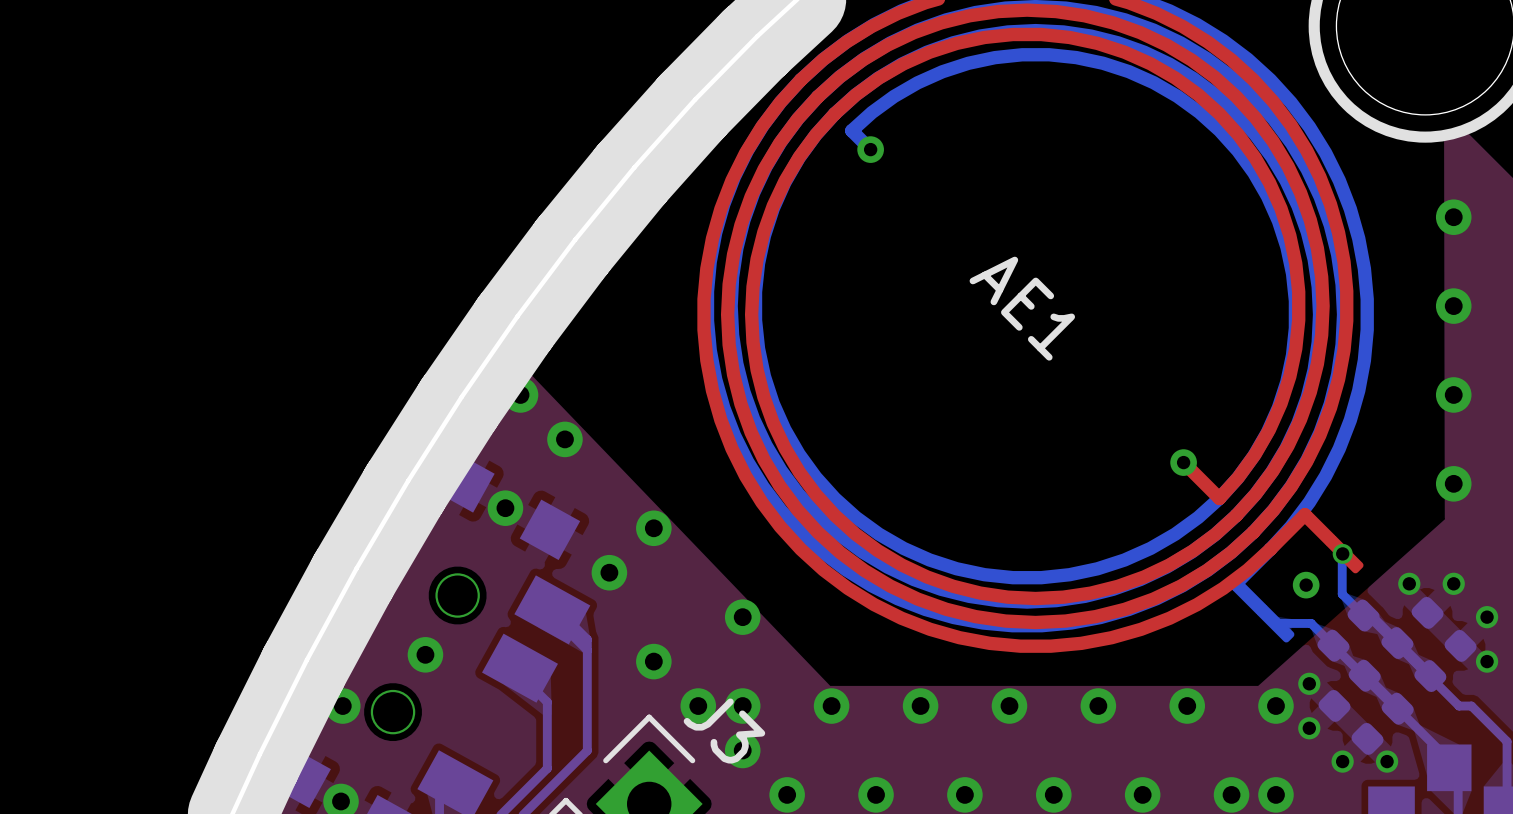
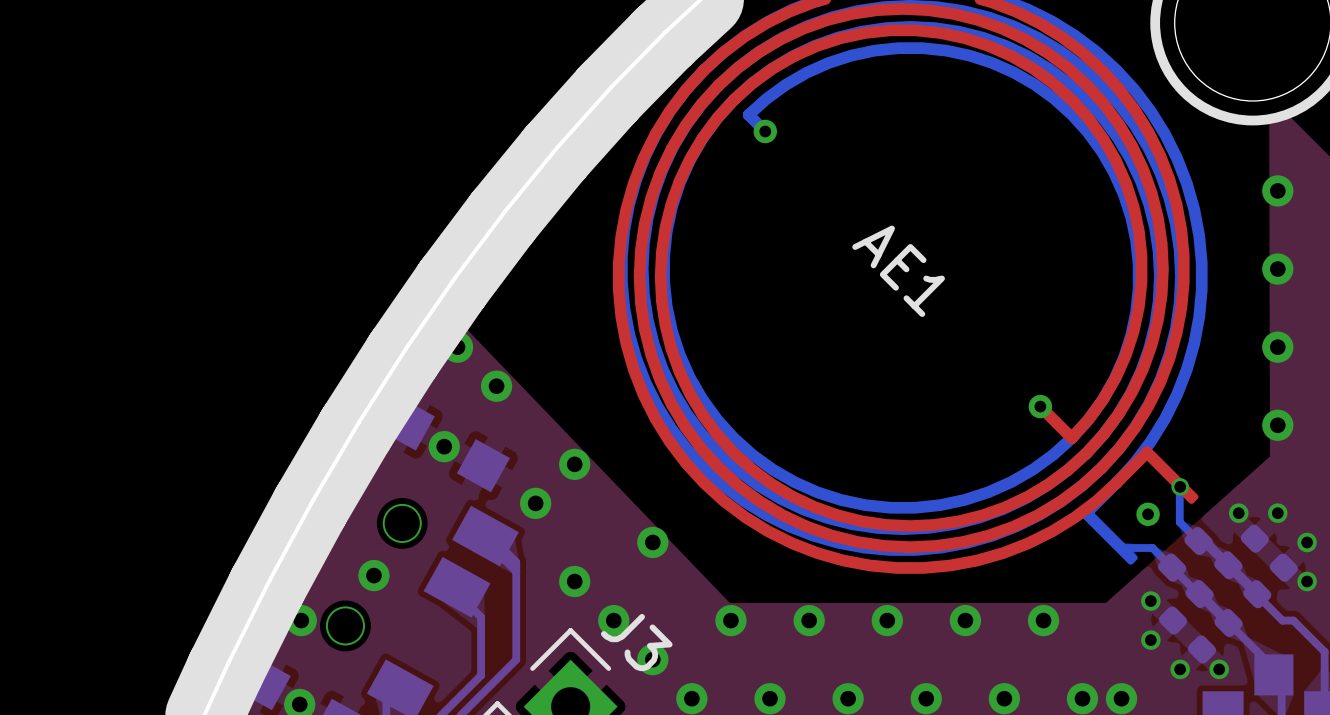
via: (742, 706) -> none
via: (1275, 706) -> none

